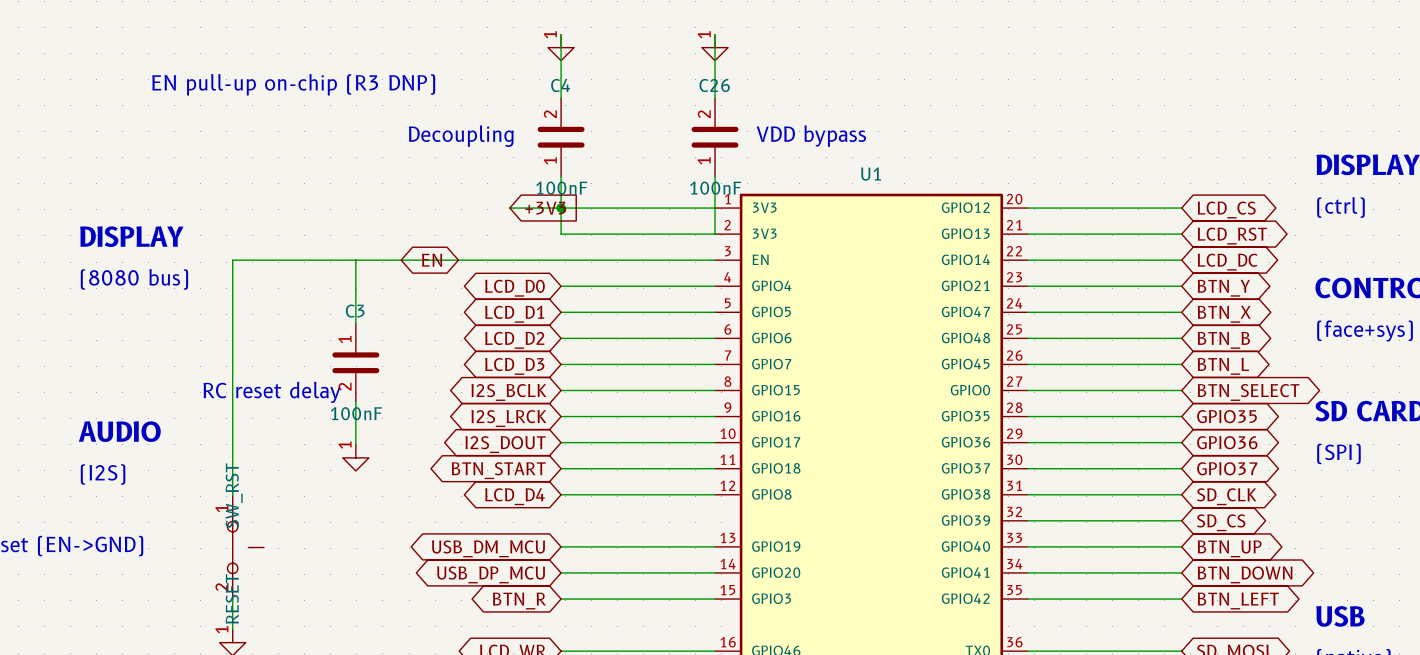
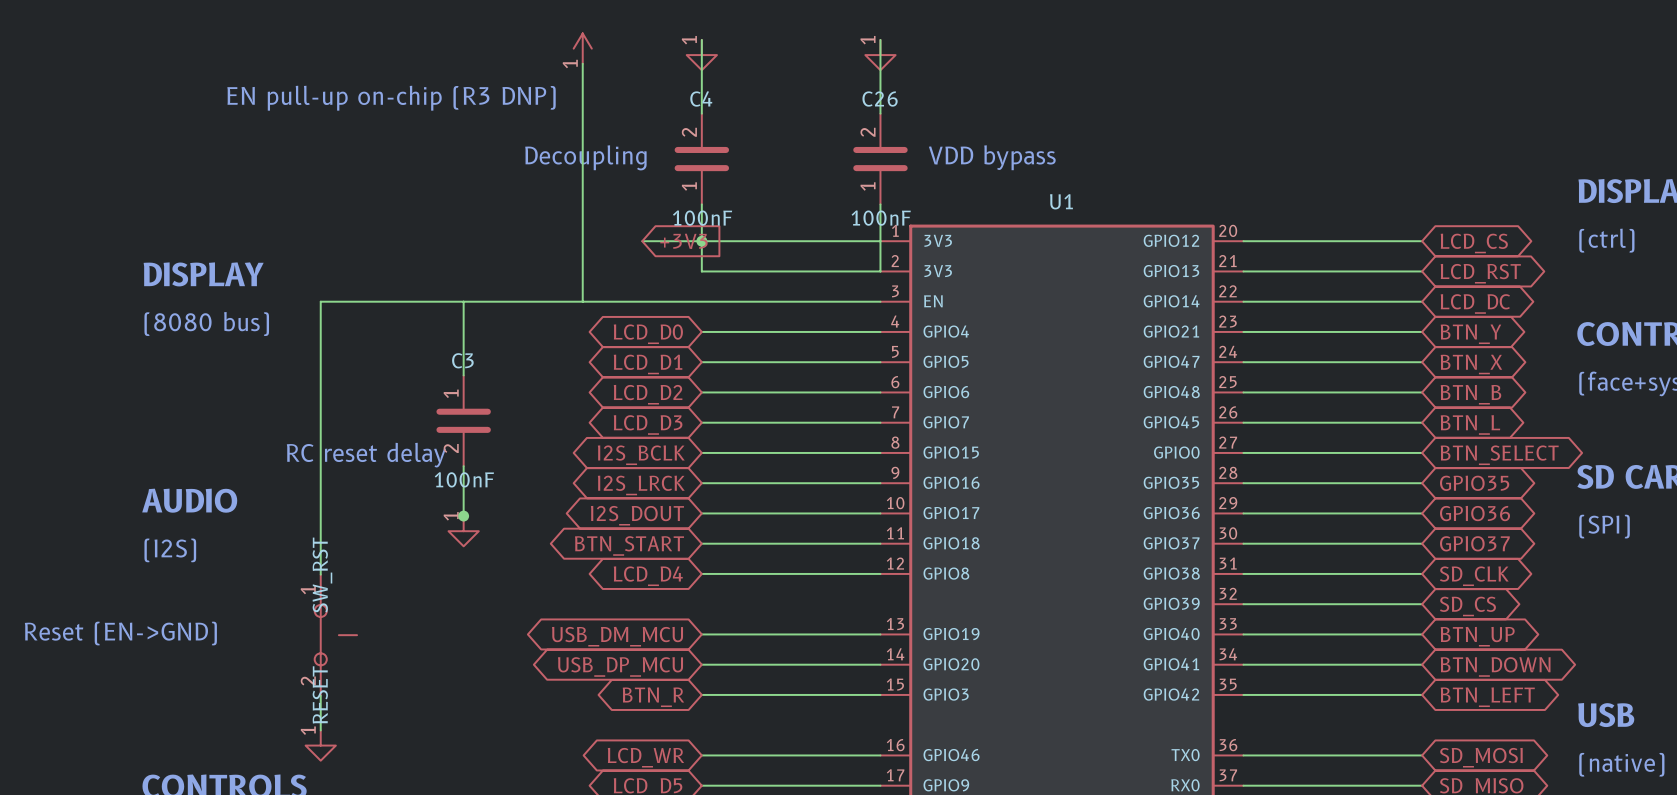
power symbol: none -> (582, 48)
wire: none -> (582, 63) (582, 301)
global label: EN (432, 260) -> none
junction: none -> (463, 516)

